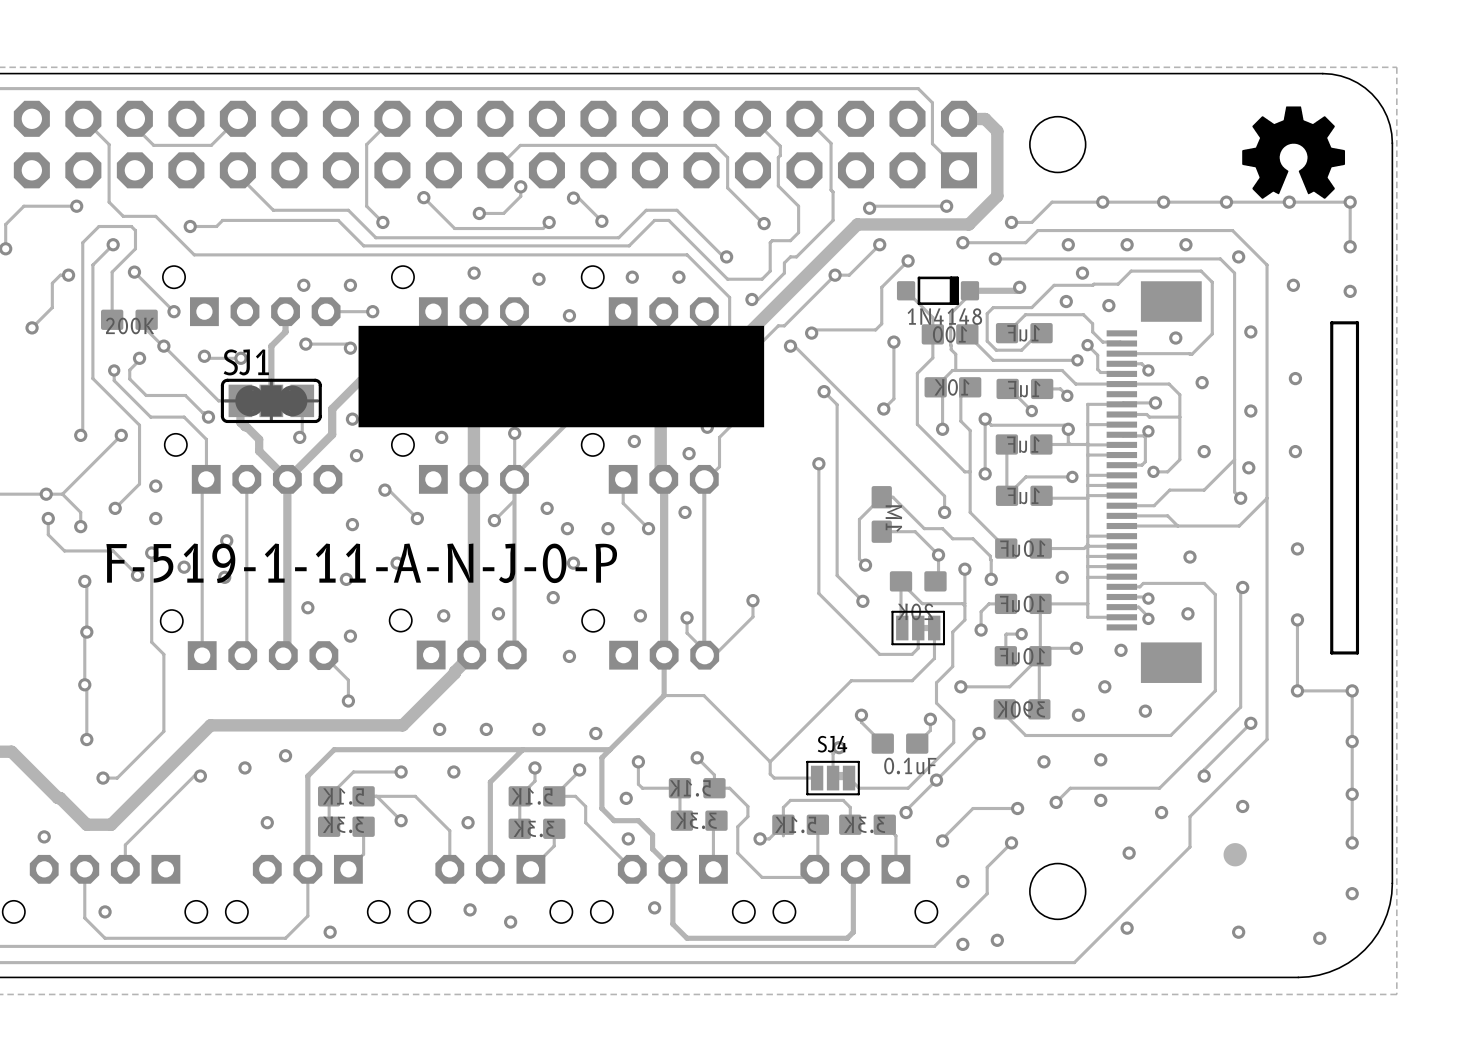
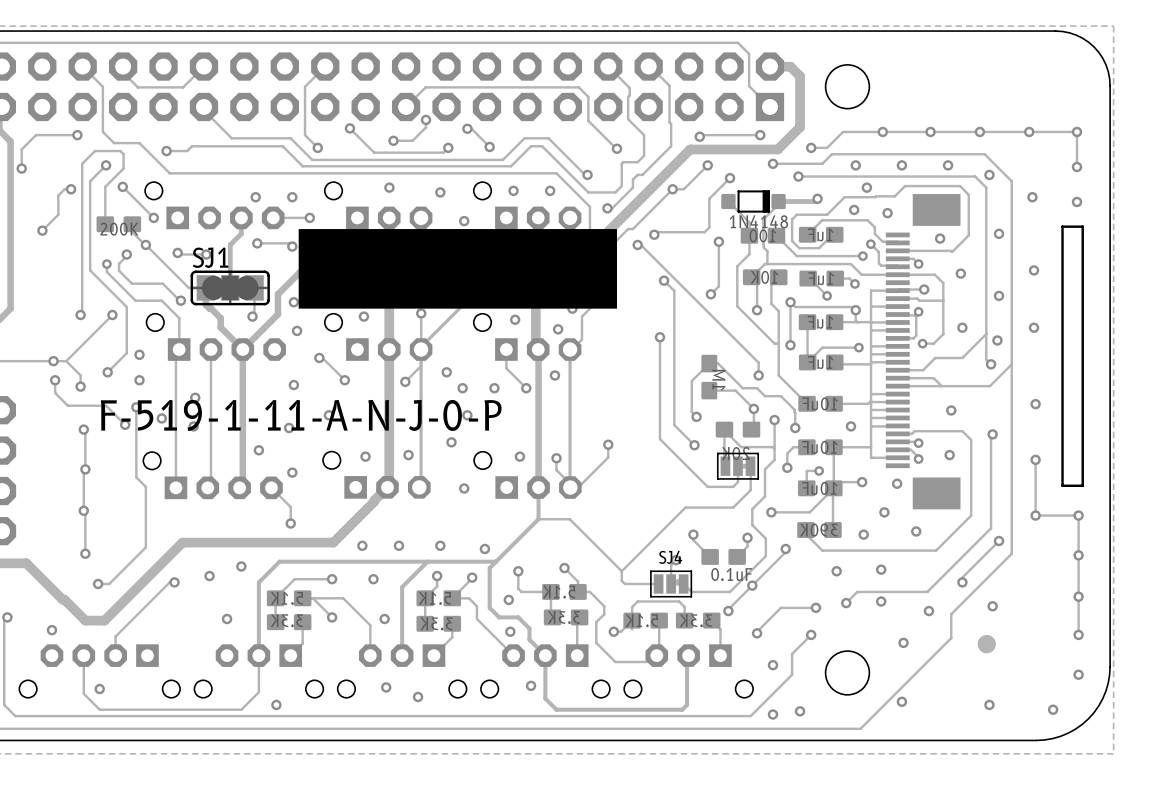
drawing: [1242, 106, 1346, 199] -> none

